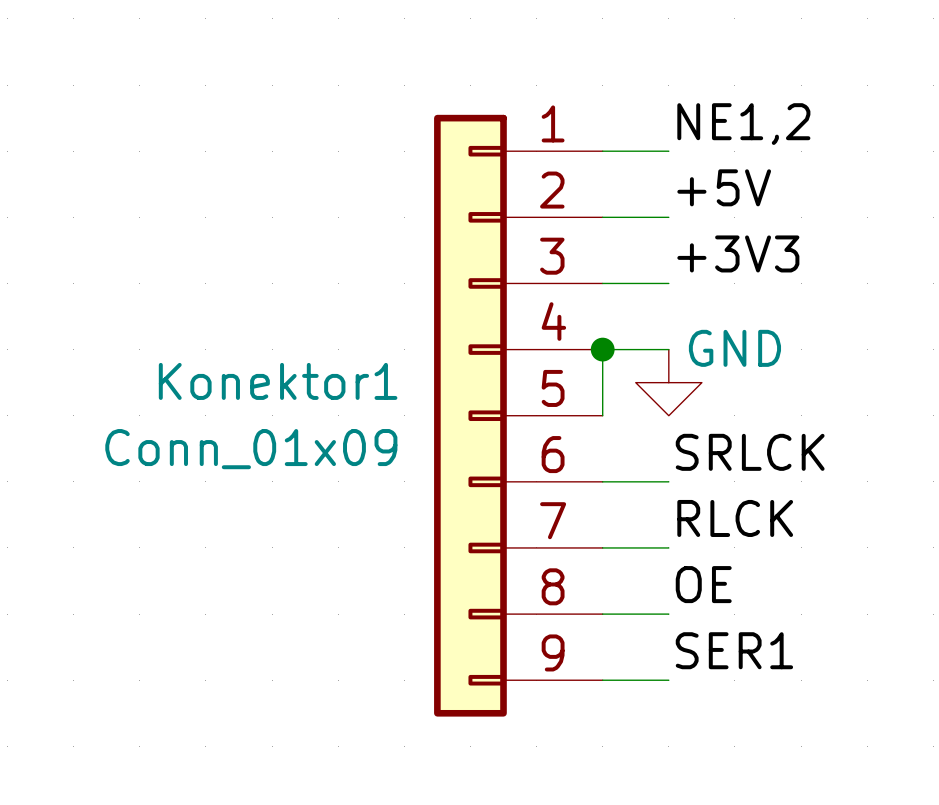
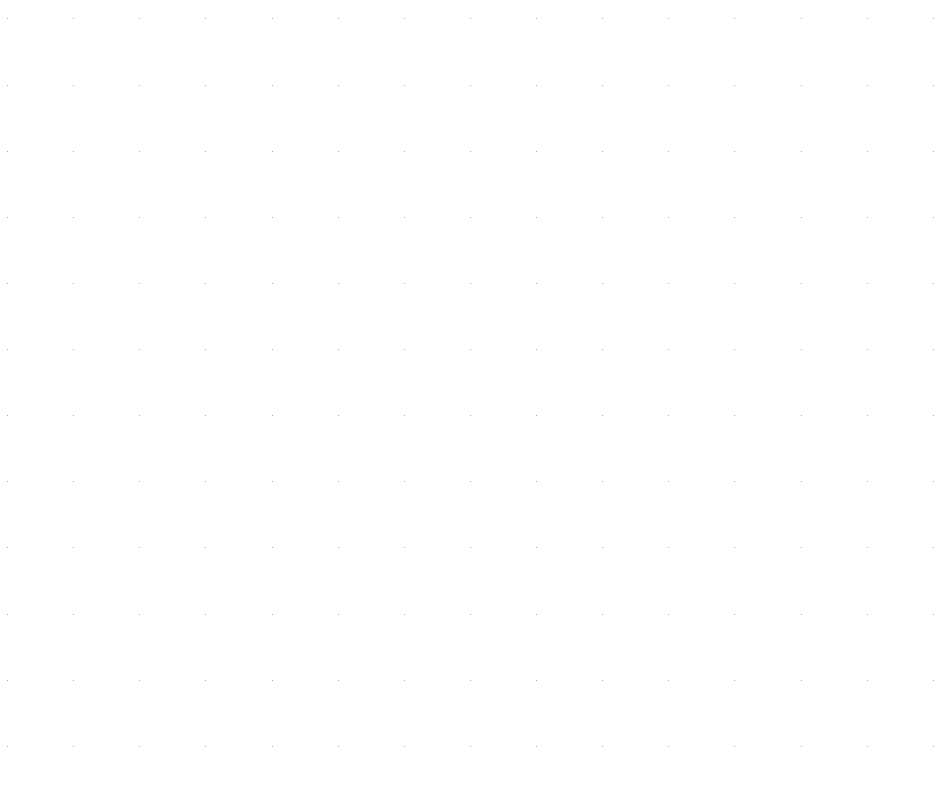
label: NE1,2 (743, 124) -> none
wire: (602, 151) (668, 151) -> none
label: +5V (724, 187) -> none
wire: (602, 217) (668, 217) -> none
label: +3V3 (738, 253) -> none
wire: (602, 283) (668, 283) -> none
junction: (602, 349) -> none
wire: (668, 349) (602, 349) (602, 415) -> none
power symbol: GND (668, 382) -> none
Konektor1: Conn_01x09 (518, 415) -> none
label: SRLCK (750, 452) -> none
wire: (602, 481) (668, 481) -> none
label: RLCK (735, 518) -> none
wire: (602, 547) (668, 547) -> none
label: OE (703, 584) -> none
wire: (602, 614) (668, 614) -> none
label: SER1 (734, 650) -> none
wire: (602, 680) (668, 680) -> none

